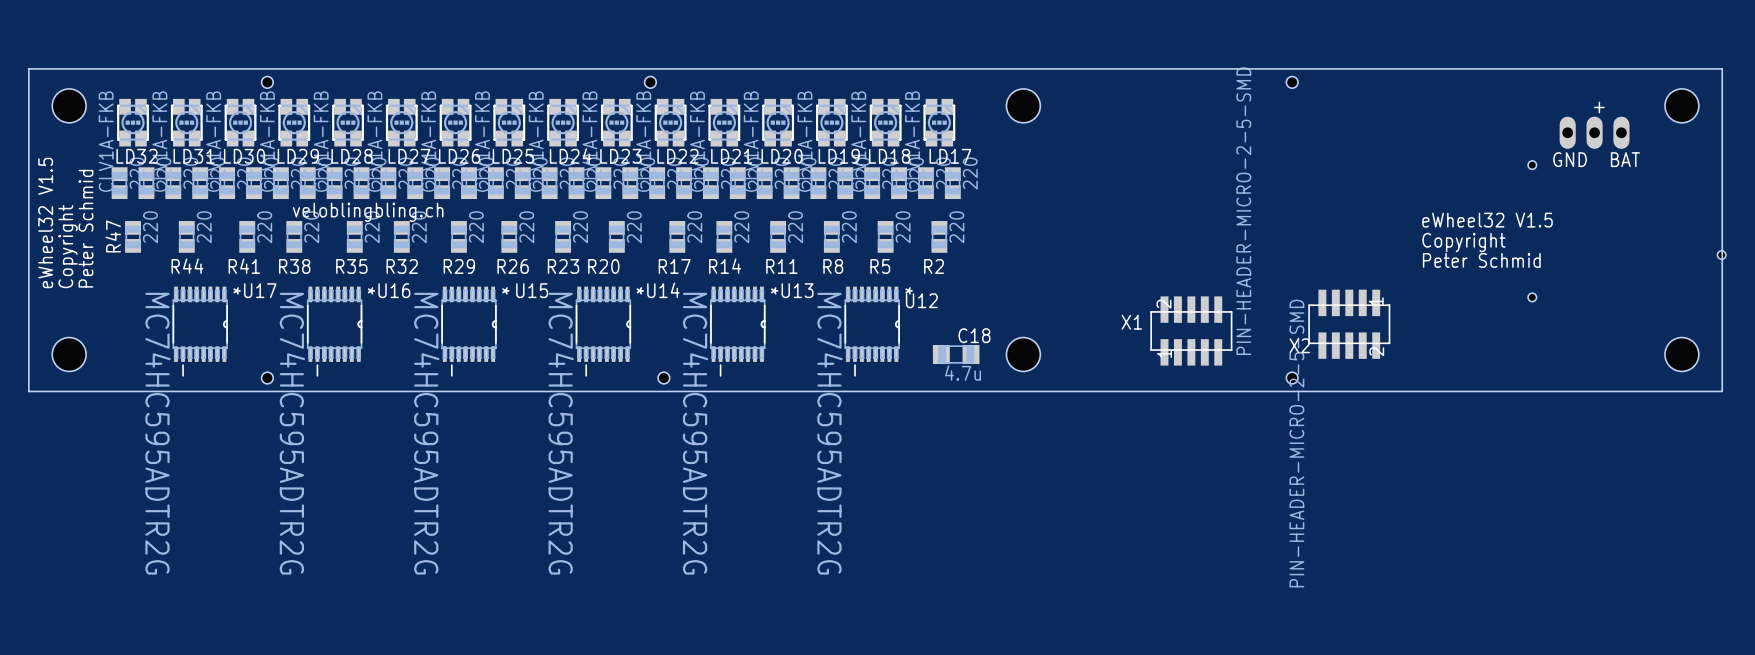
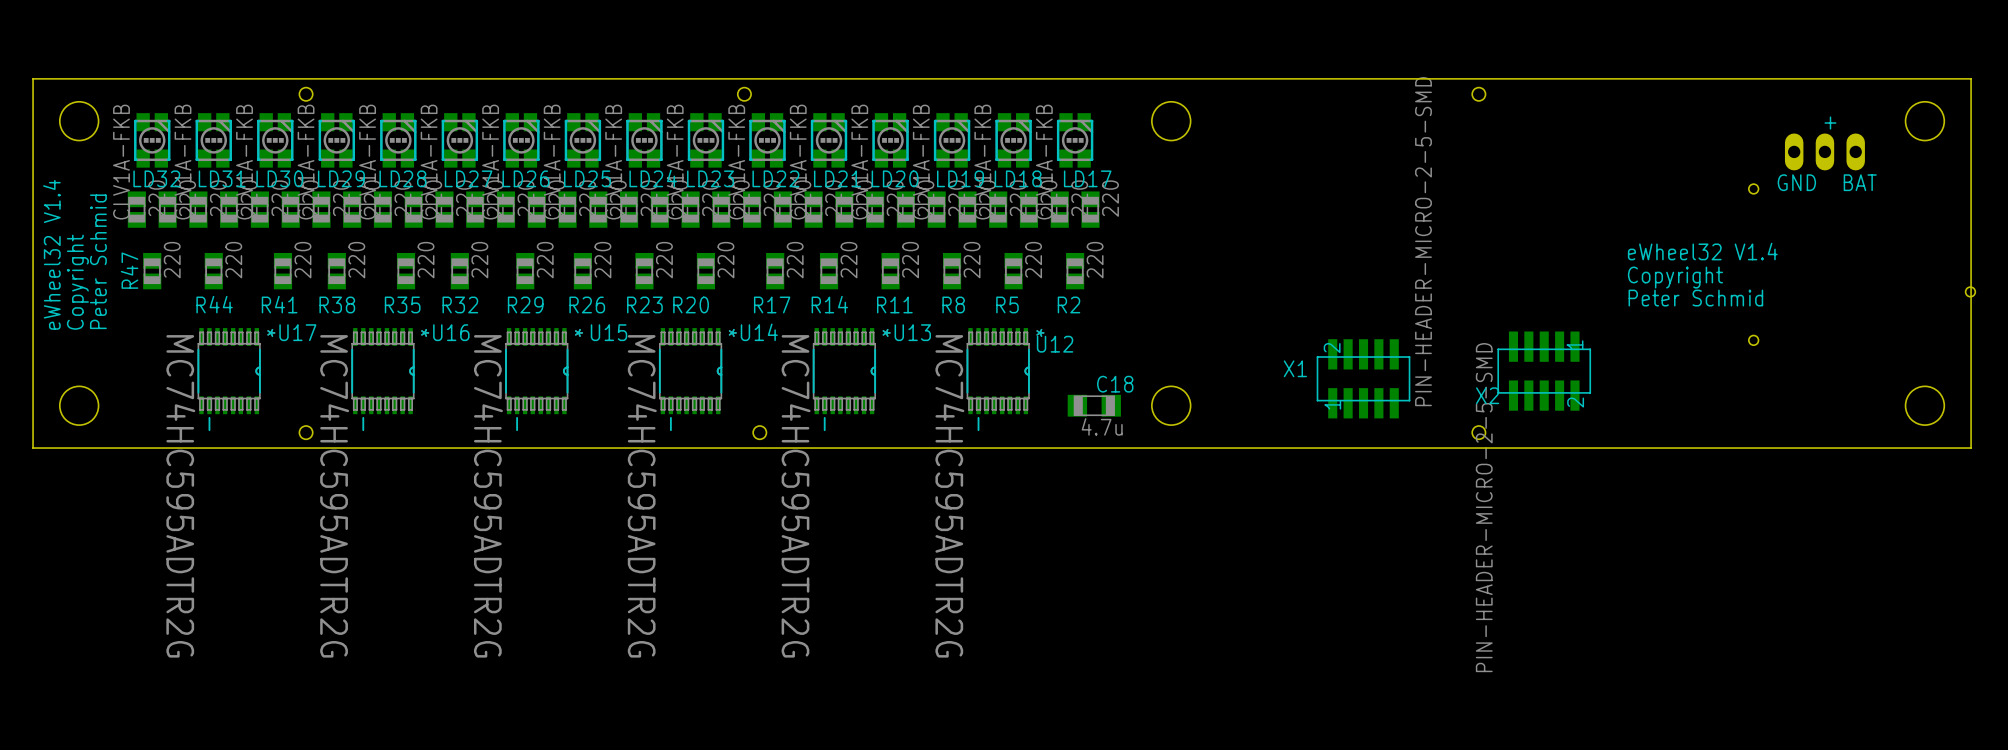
text: veloblingbling.ch (368, 212) -> none
text: eWheel32 V1.5 (1487, 220) -> eWheel32 V1.4 (1702, 251)
text: eWheel32 V1.5 (45, 222) -> eWheel32 V1.4 (51, 254)

